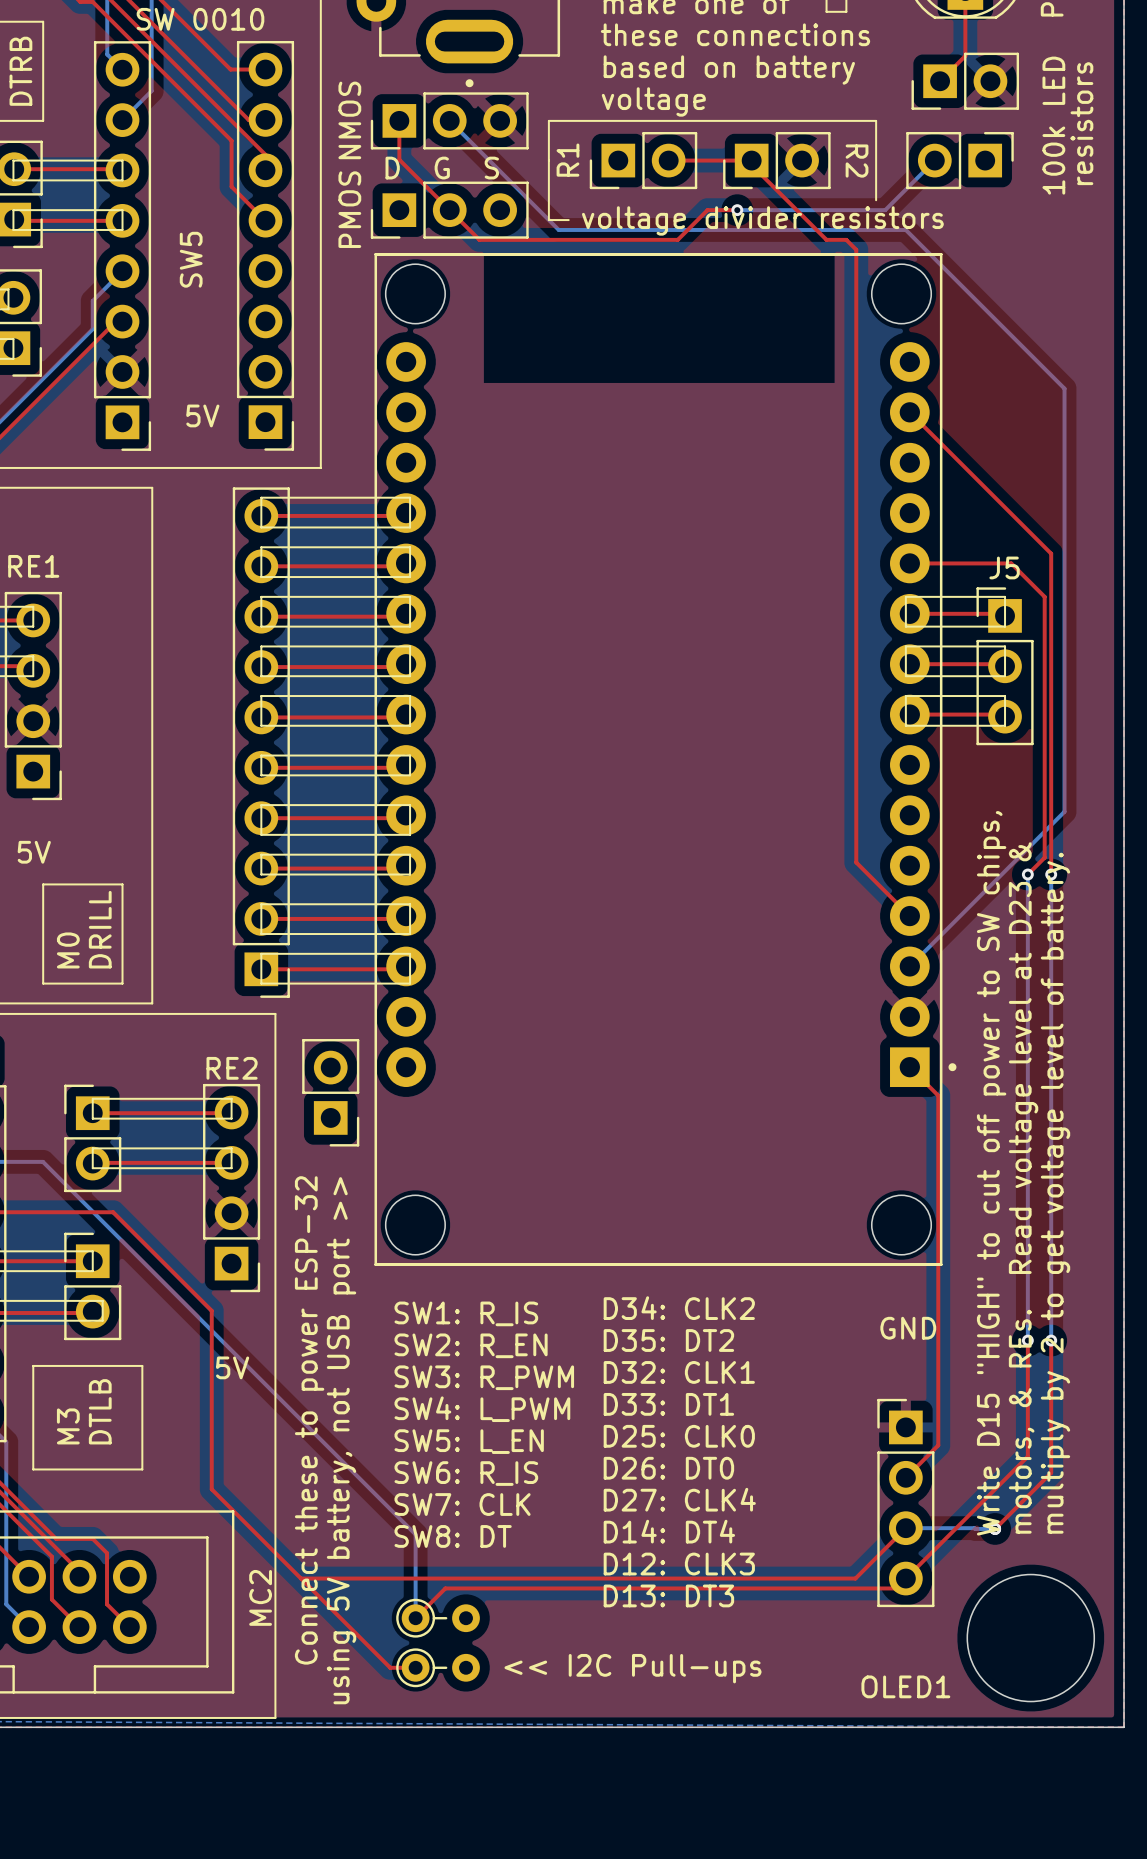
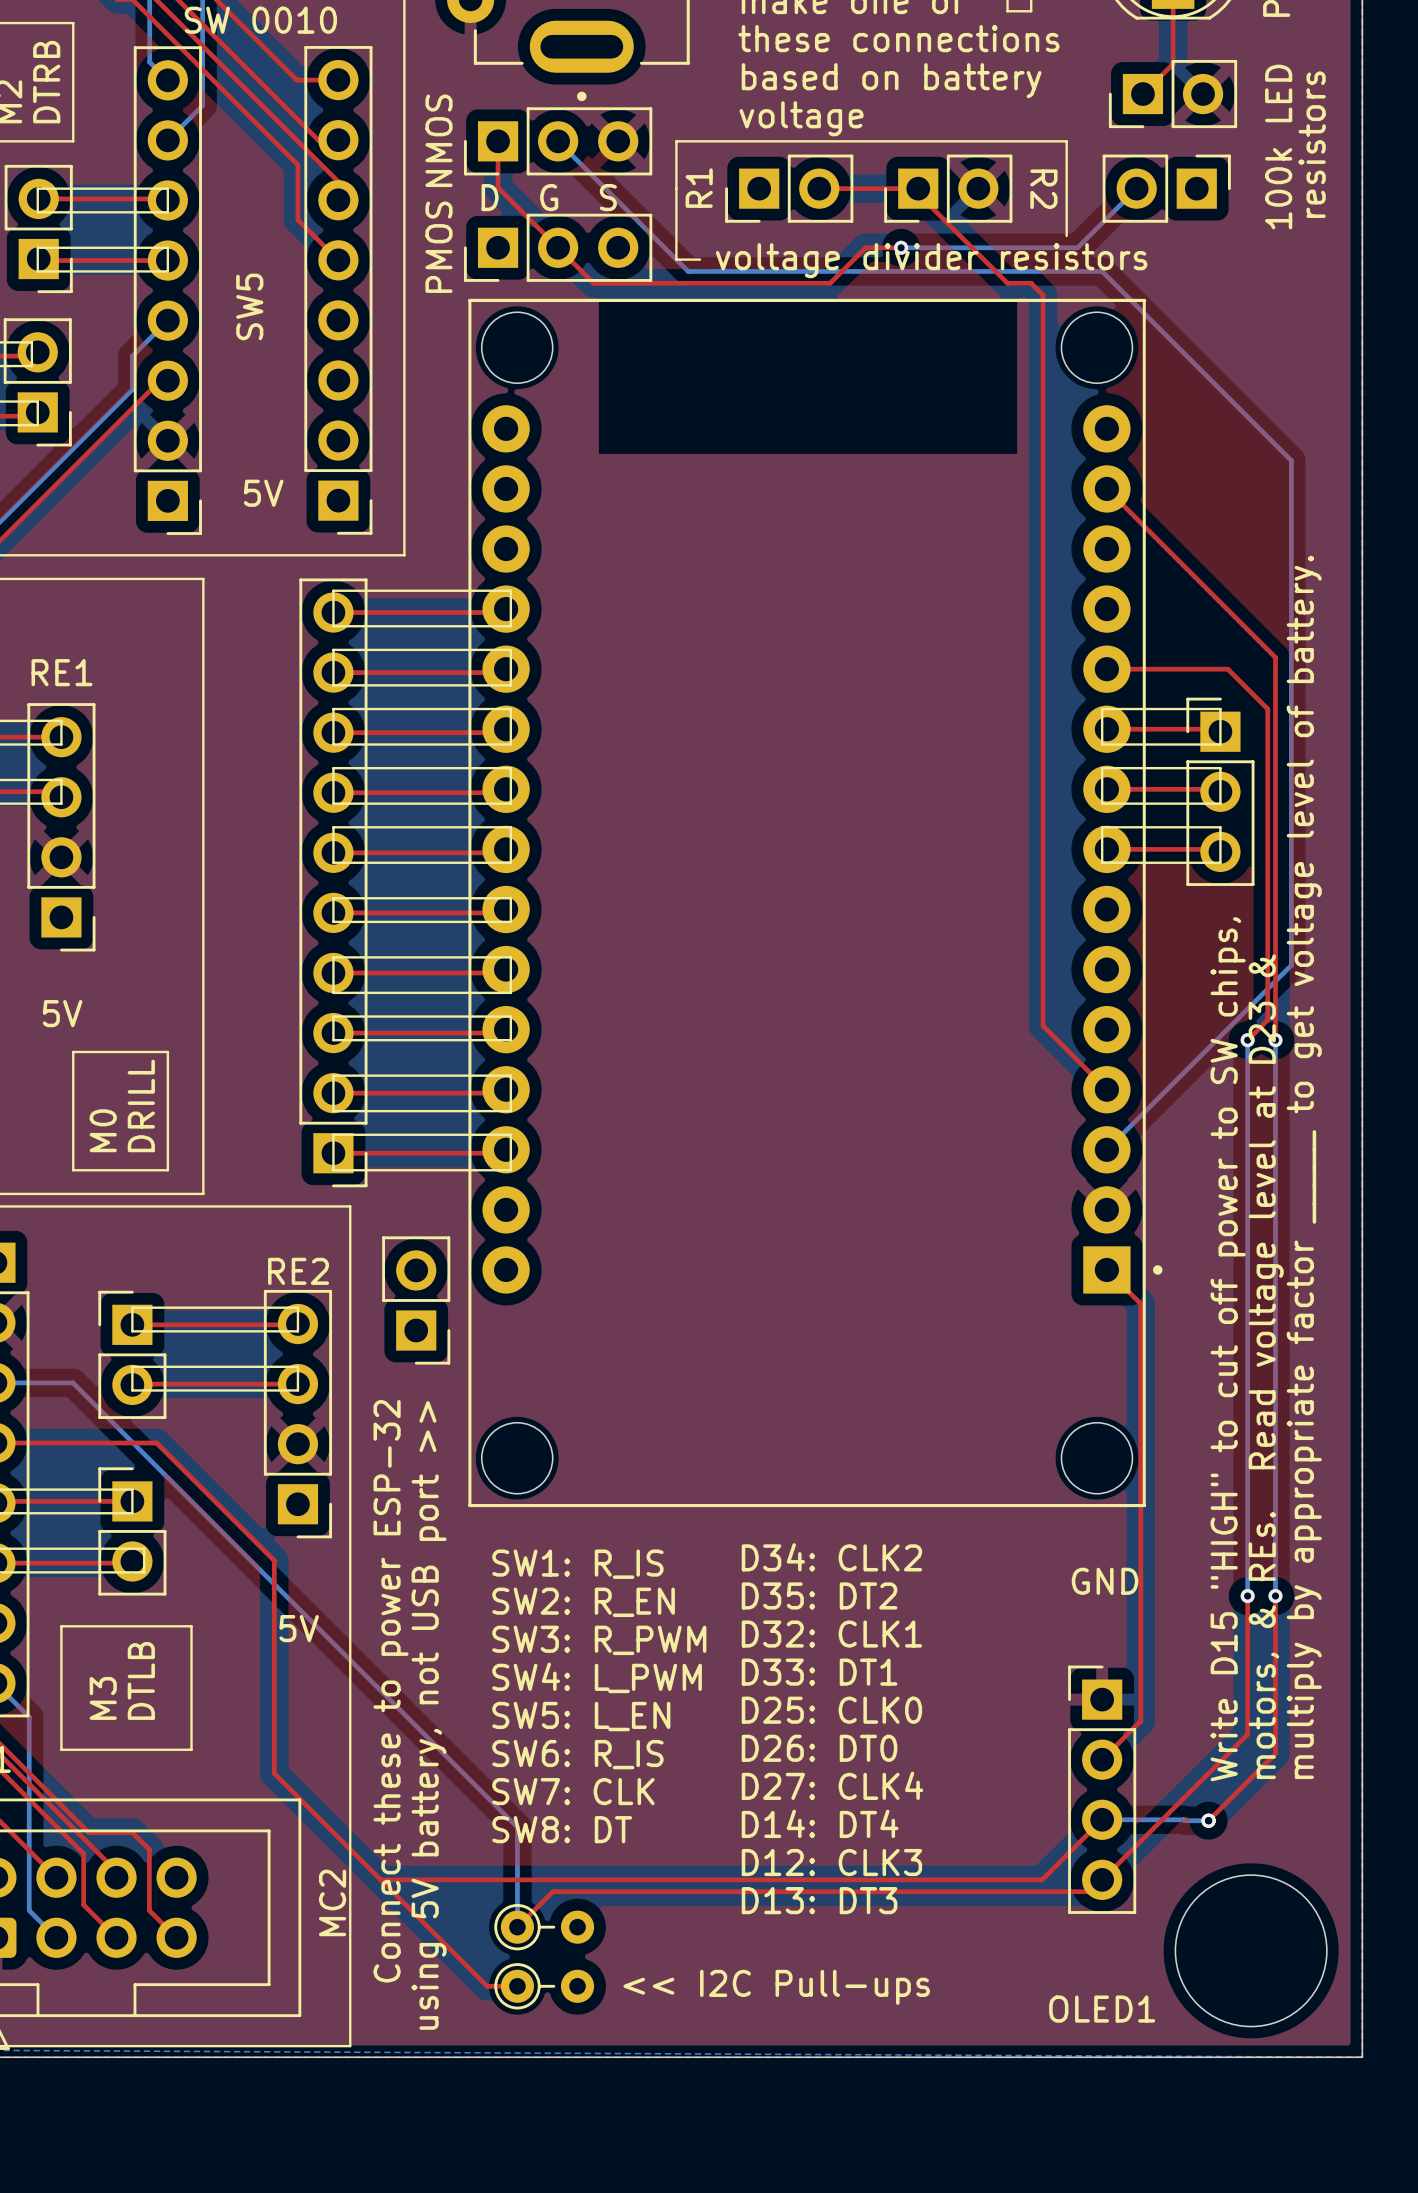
J5 name: J5 (1004, 567) -> none
text position: Write D15 "HIGH" to cut off power to SW chips, (991, 1173) -> Write D15 "HIGH" to cut off power to SW chips, (1228, 1349)
text position: motors, & REs. Read voltage level at D23 & (1023, 1187) -> motors, & REs. Read voltage level at D23 & (1266, 1366)
text: multiply by 2 to get voltage level of battery. (1055, 1193) -> multiply by appropriate factor _____ to get voltage level of battery. (1304, 1167)

